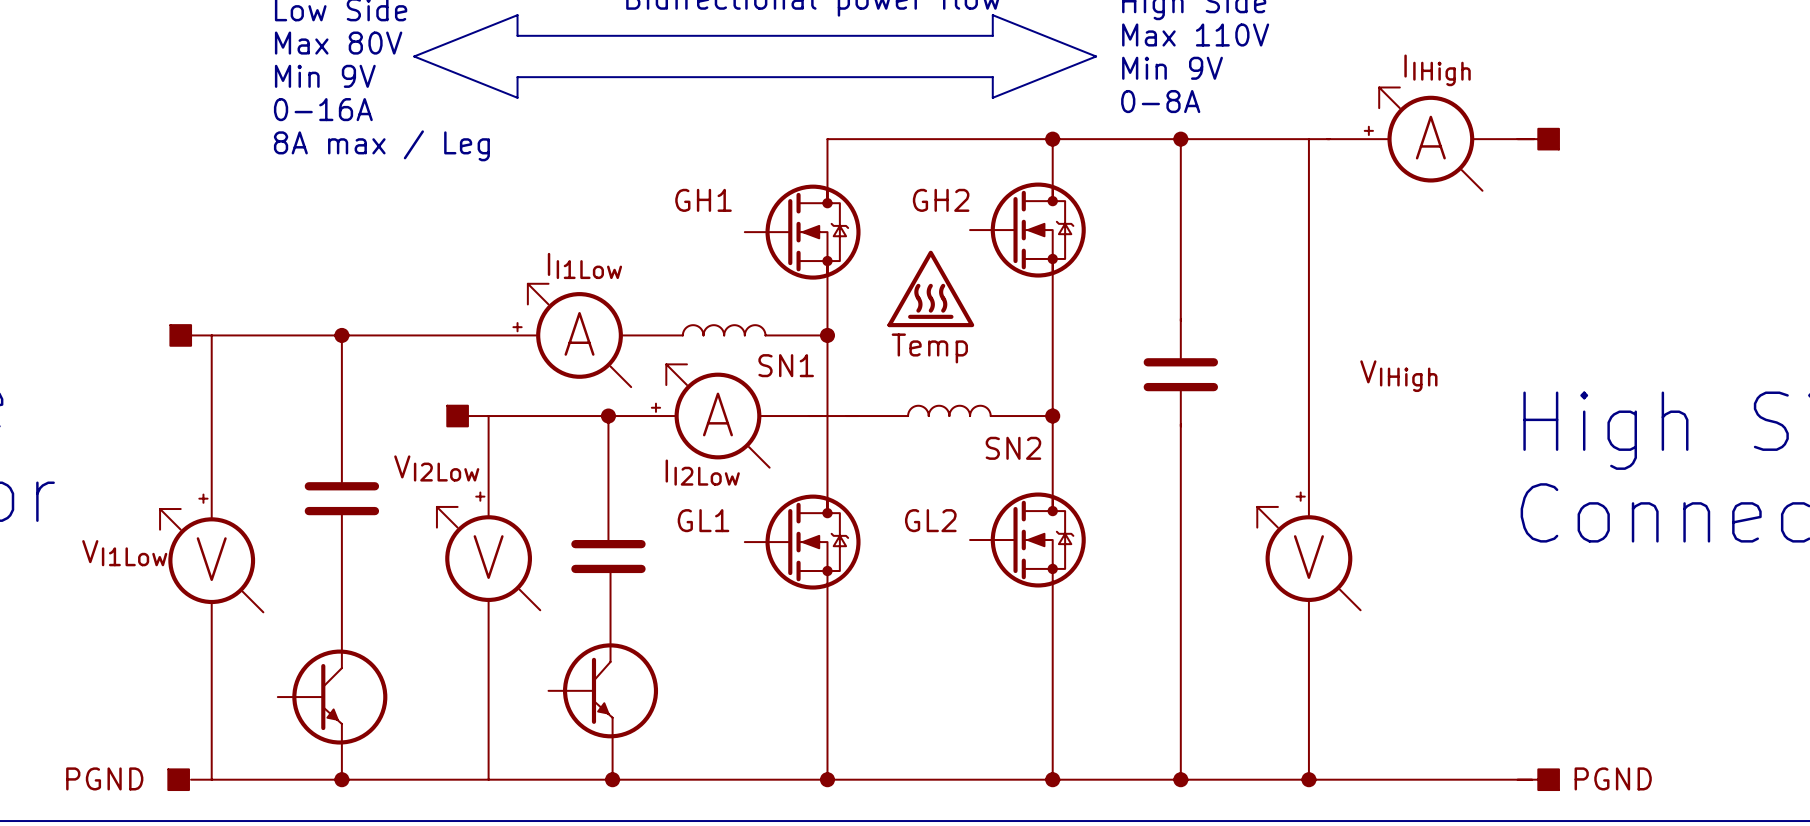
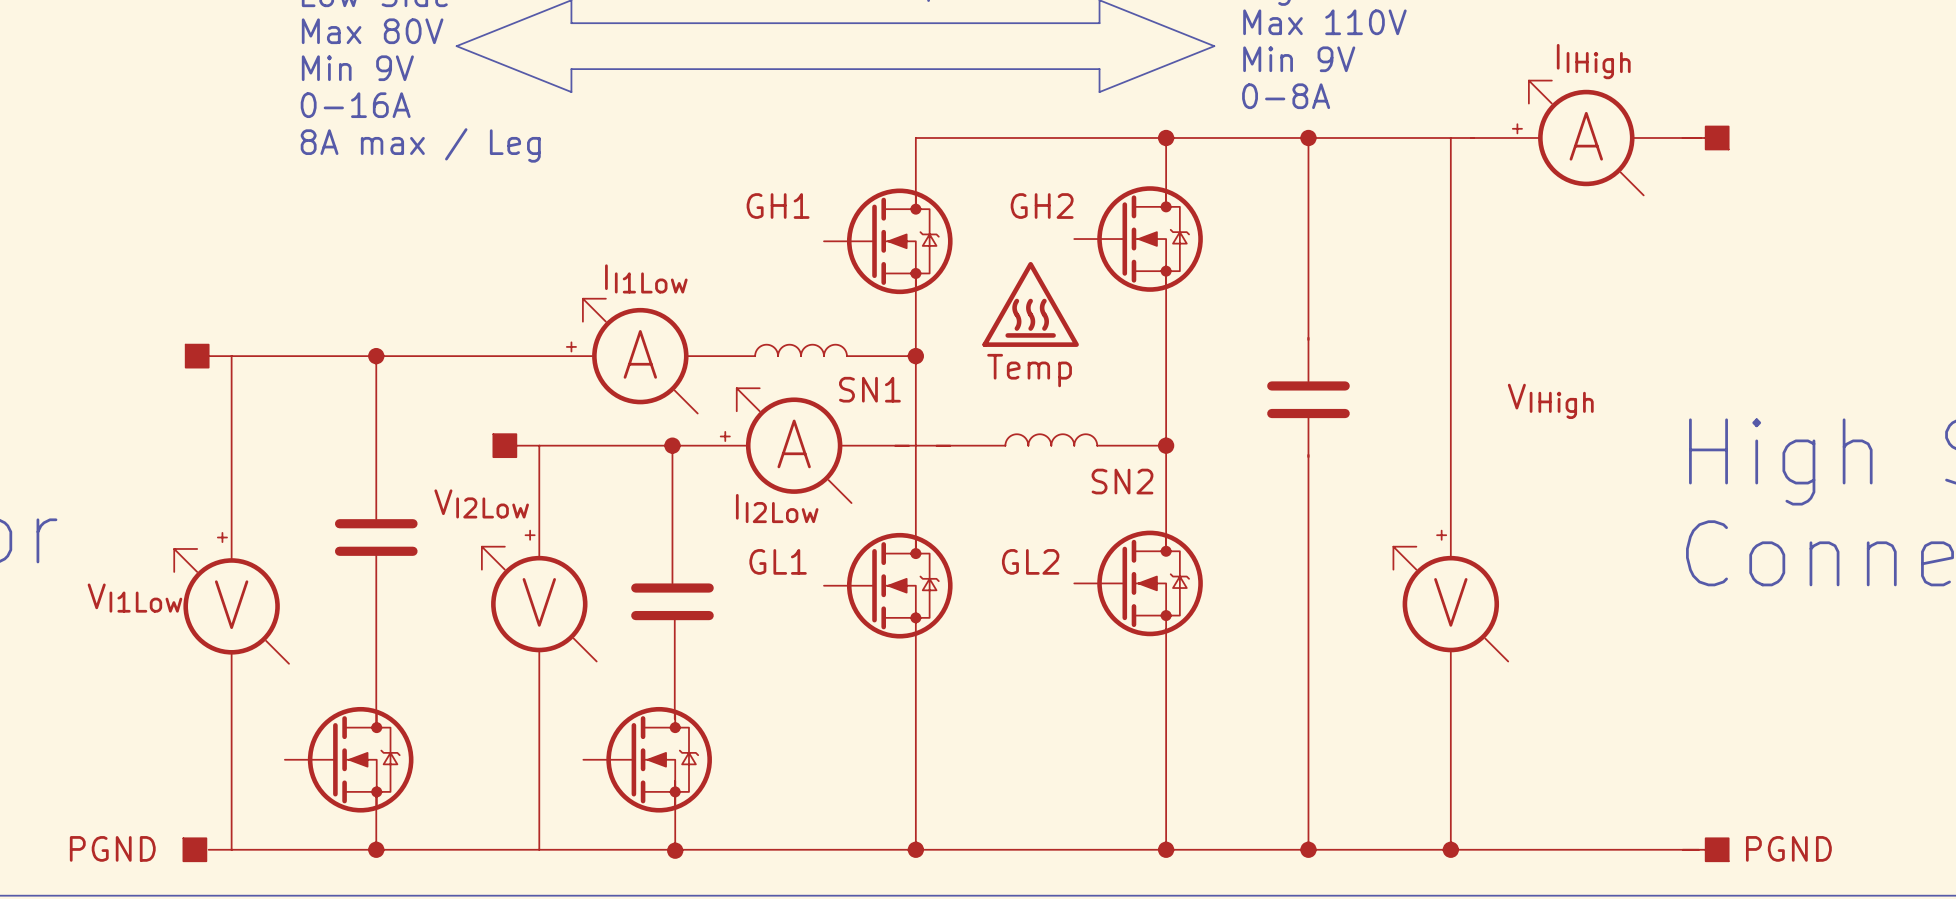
part symbol: [160, 87, 1559, 791] -> [174, 80, 1729, 862]

